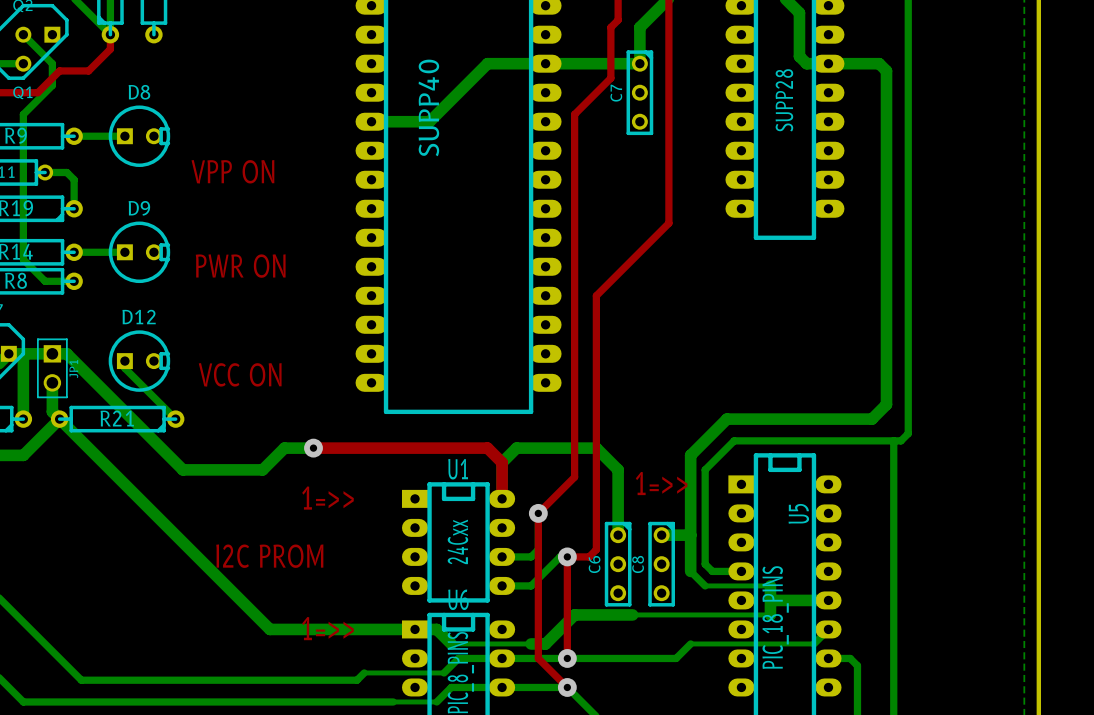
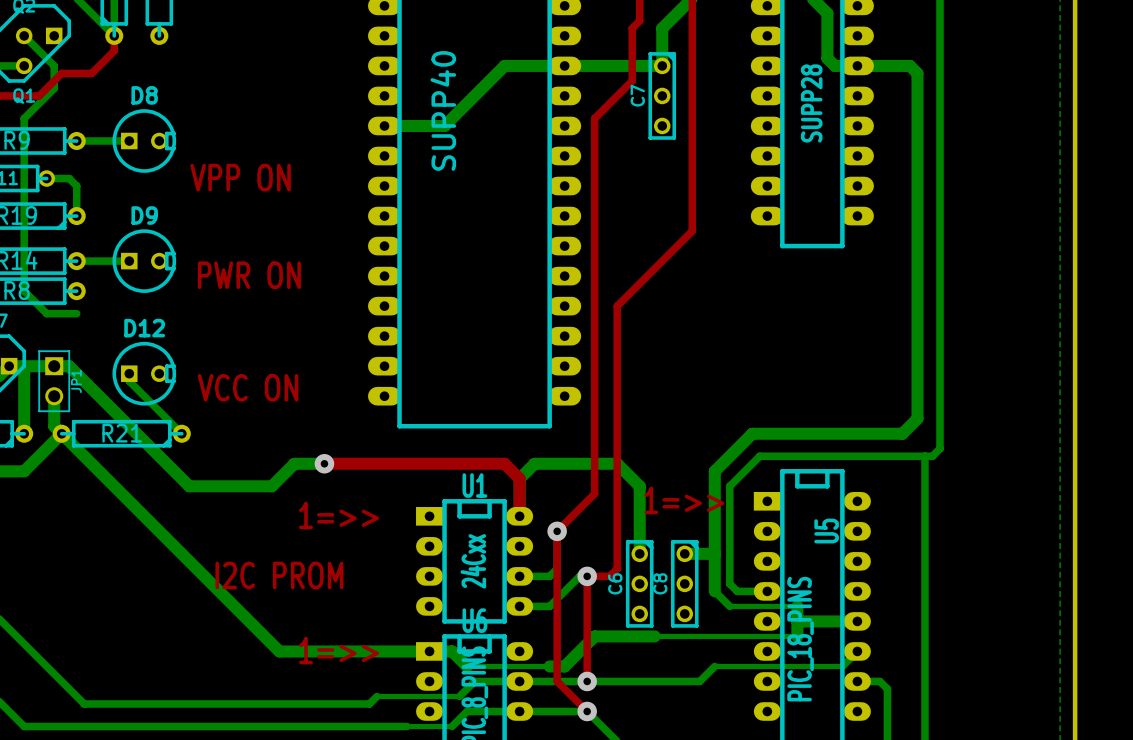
bottom track: (23, 259) (45, 281) (74, 281) -> (24, 268) (24, 291) (46, 313) (76, 313)

